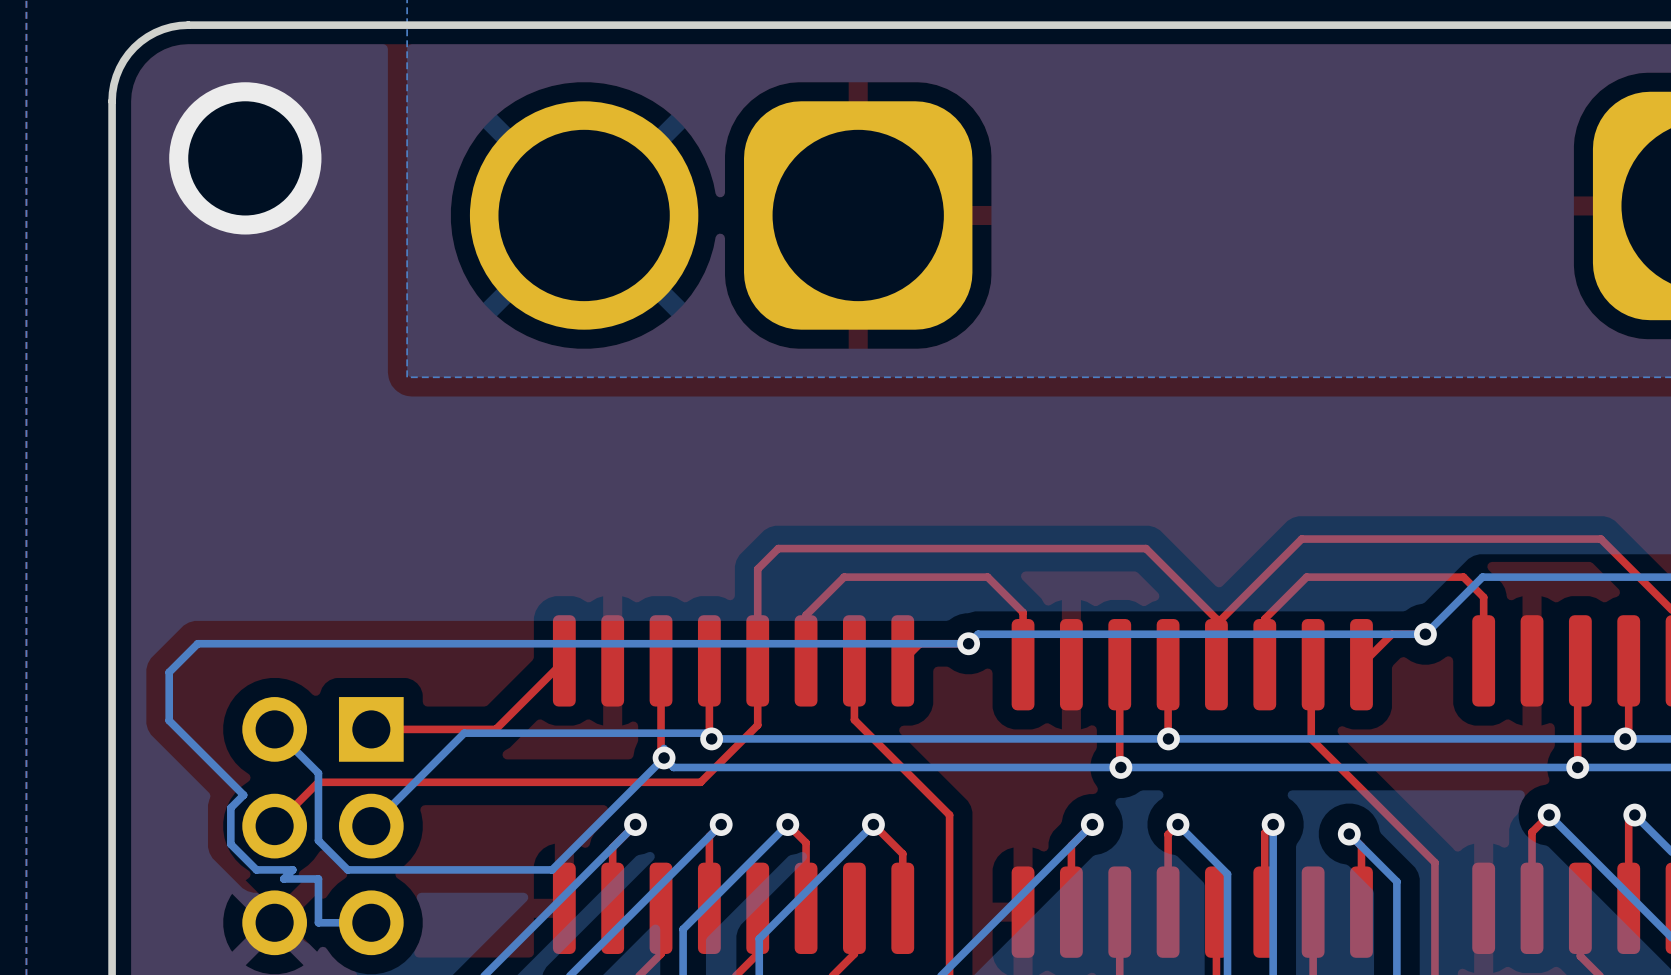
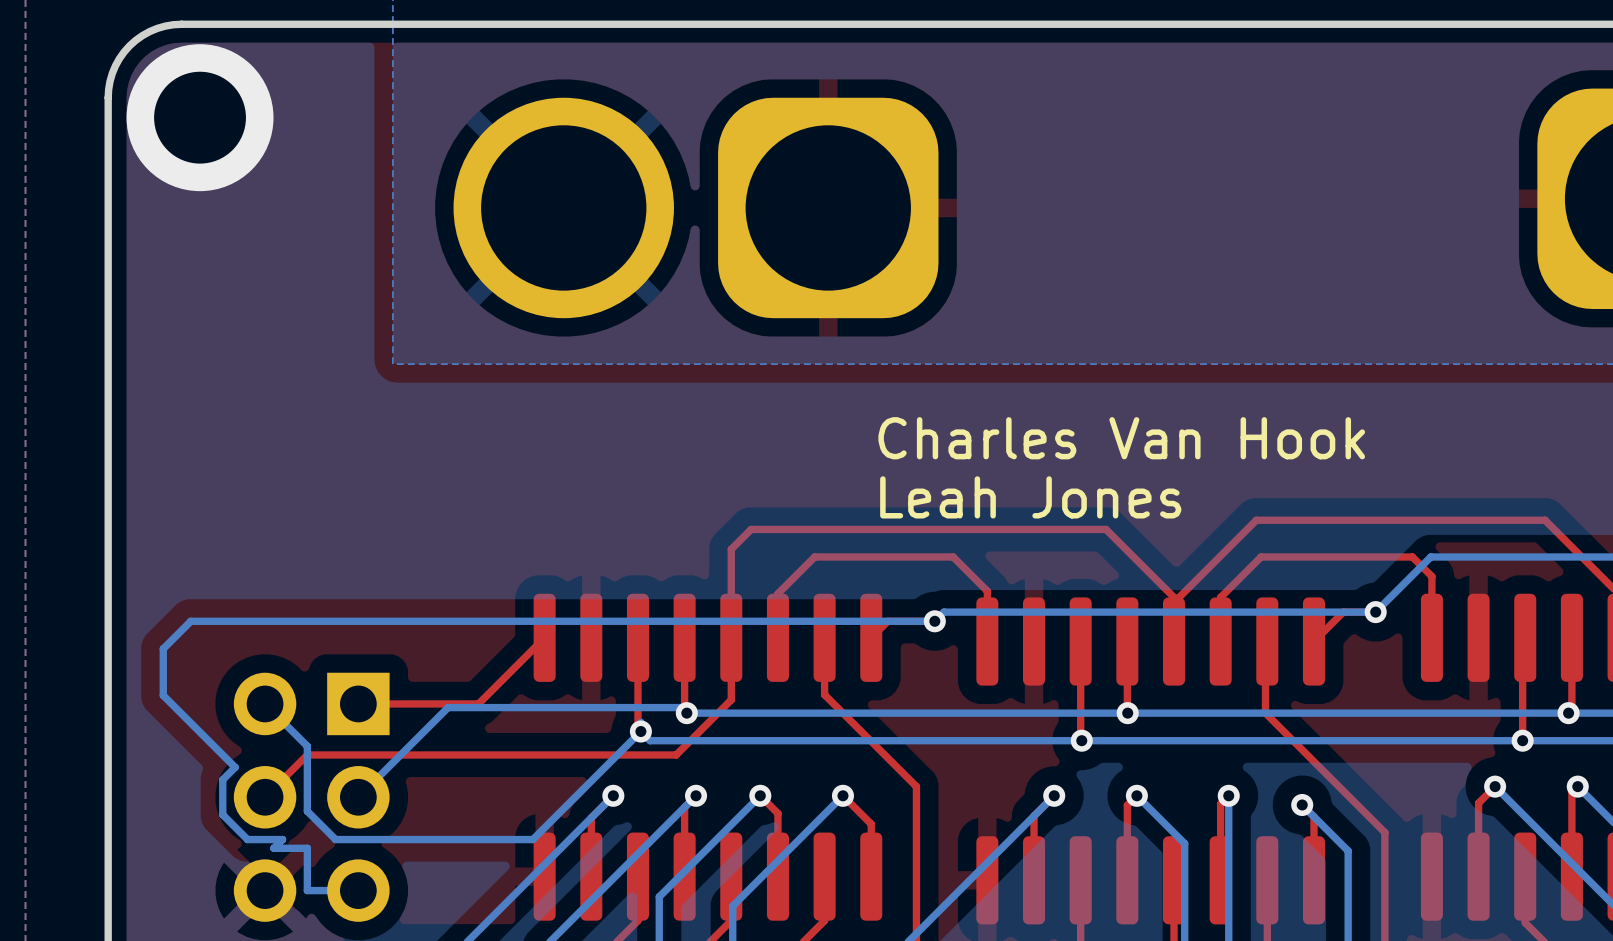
via: none -> (200, 117)
via: (245, 158) -> none
text: none -> Charles Van Hook (1121, 438)
text: none -> Leah Jones (1030, 497)

